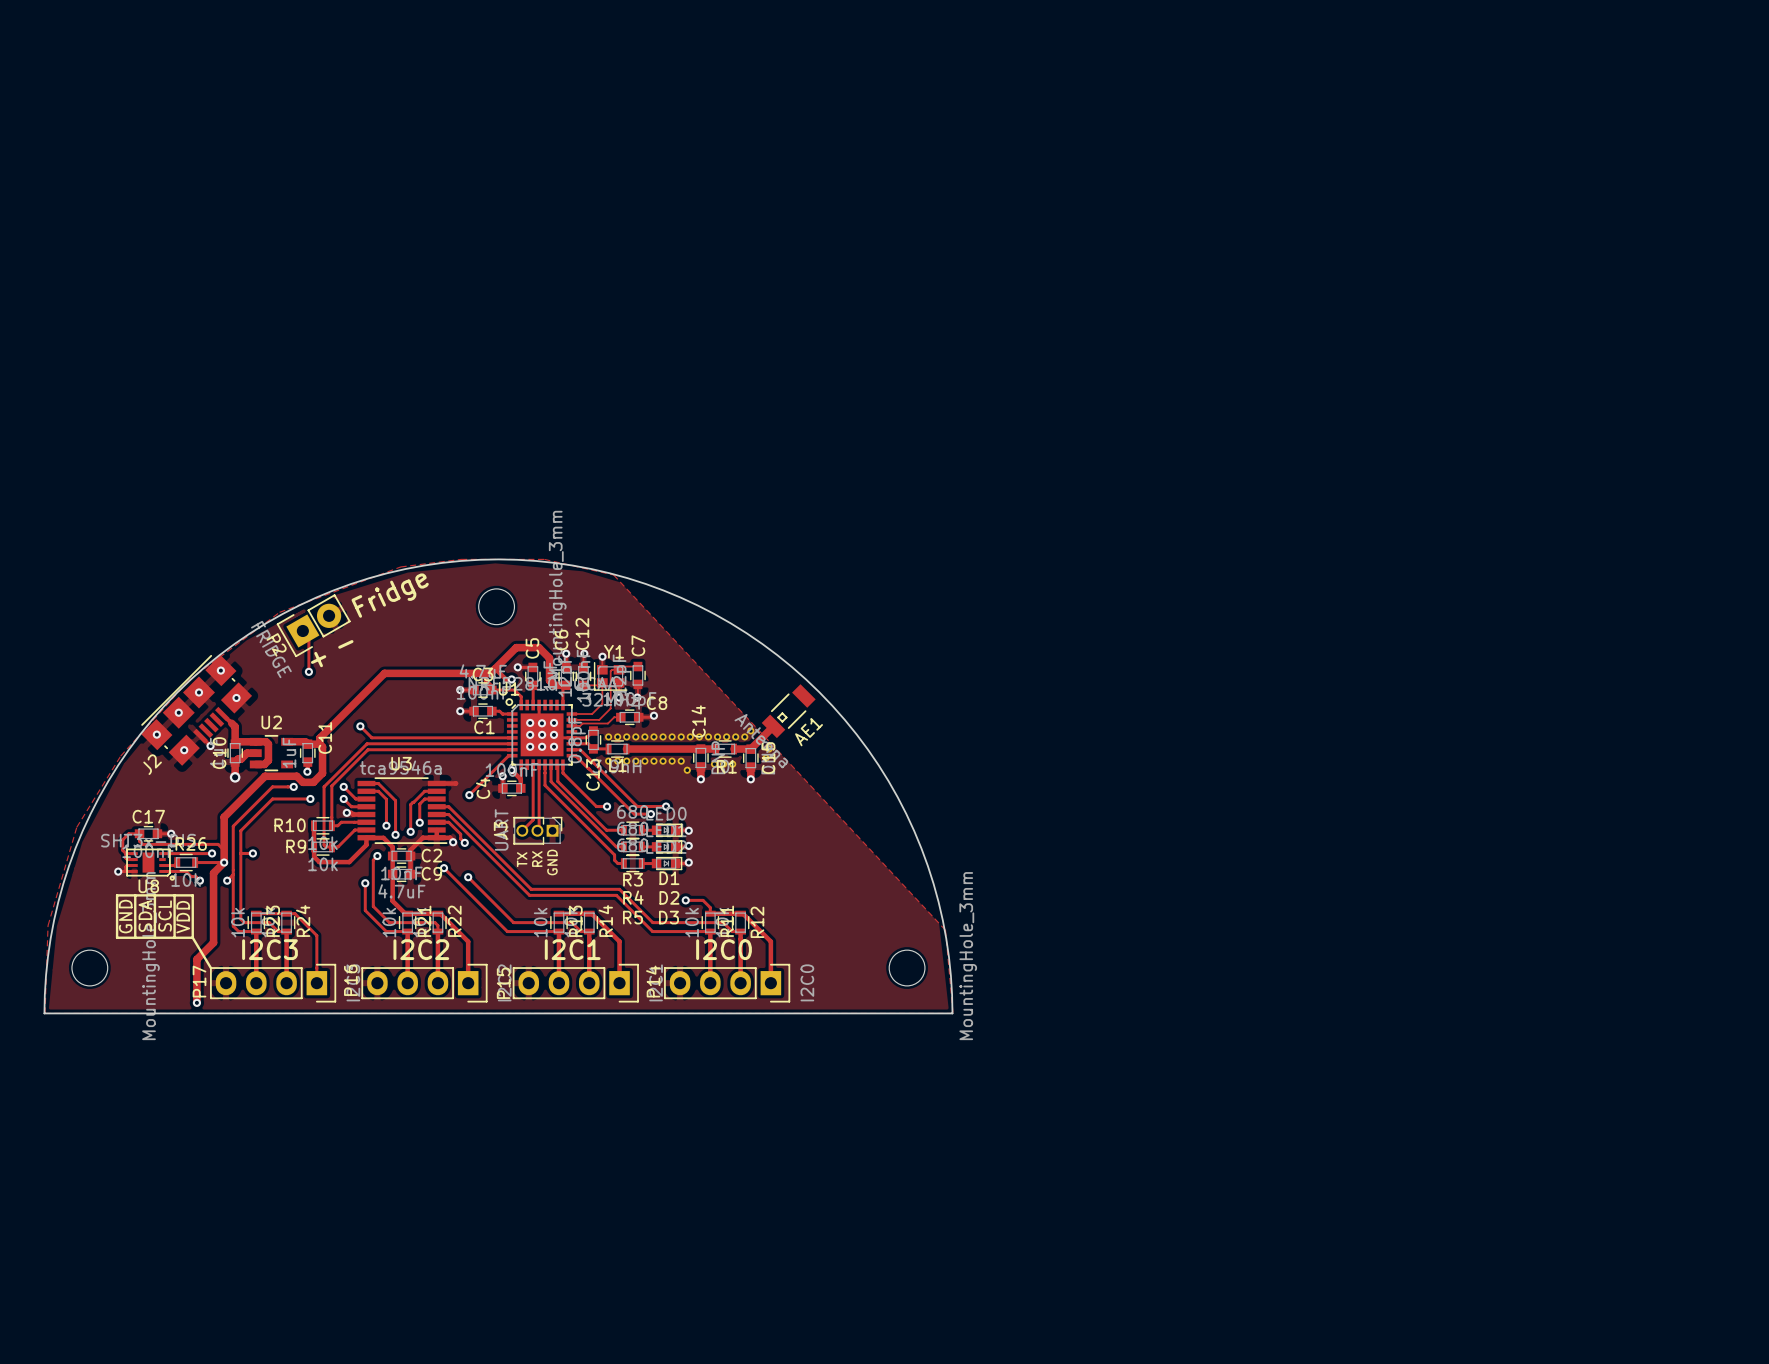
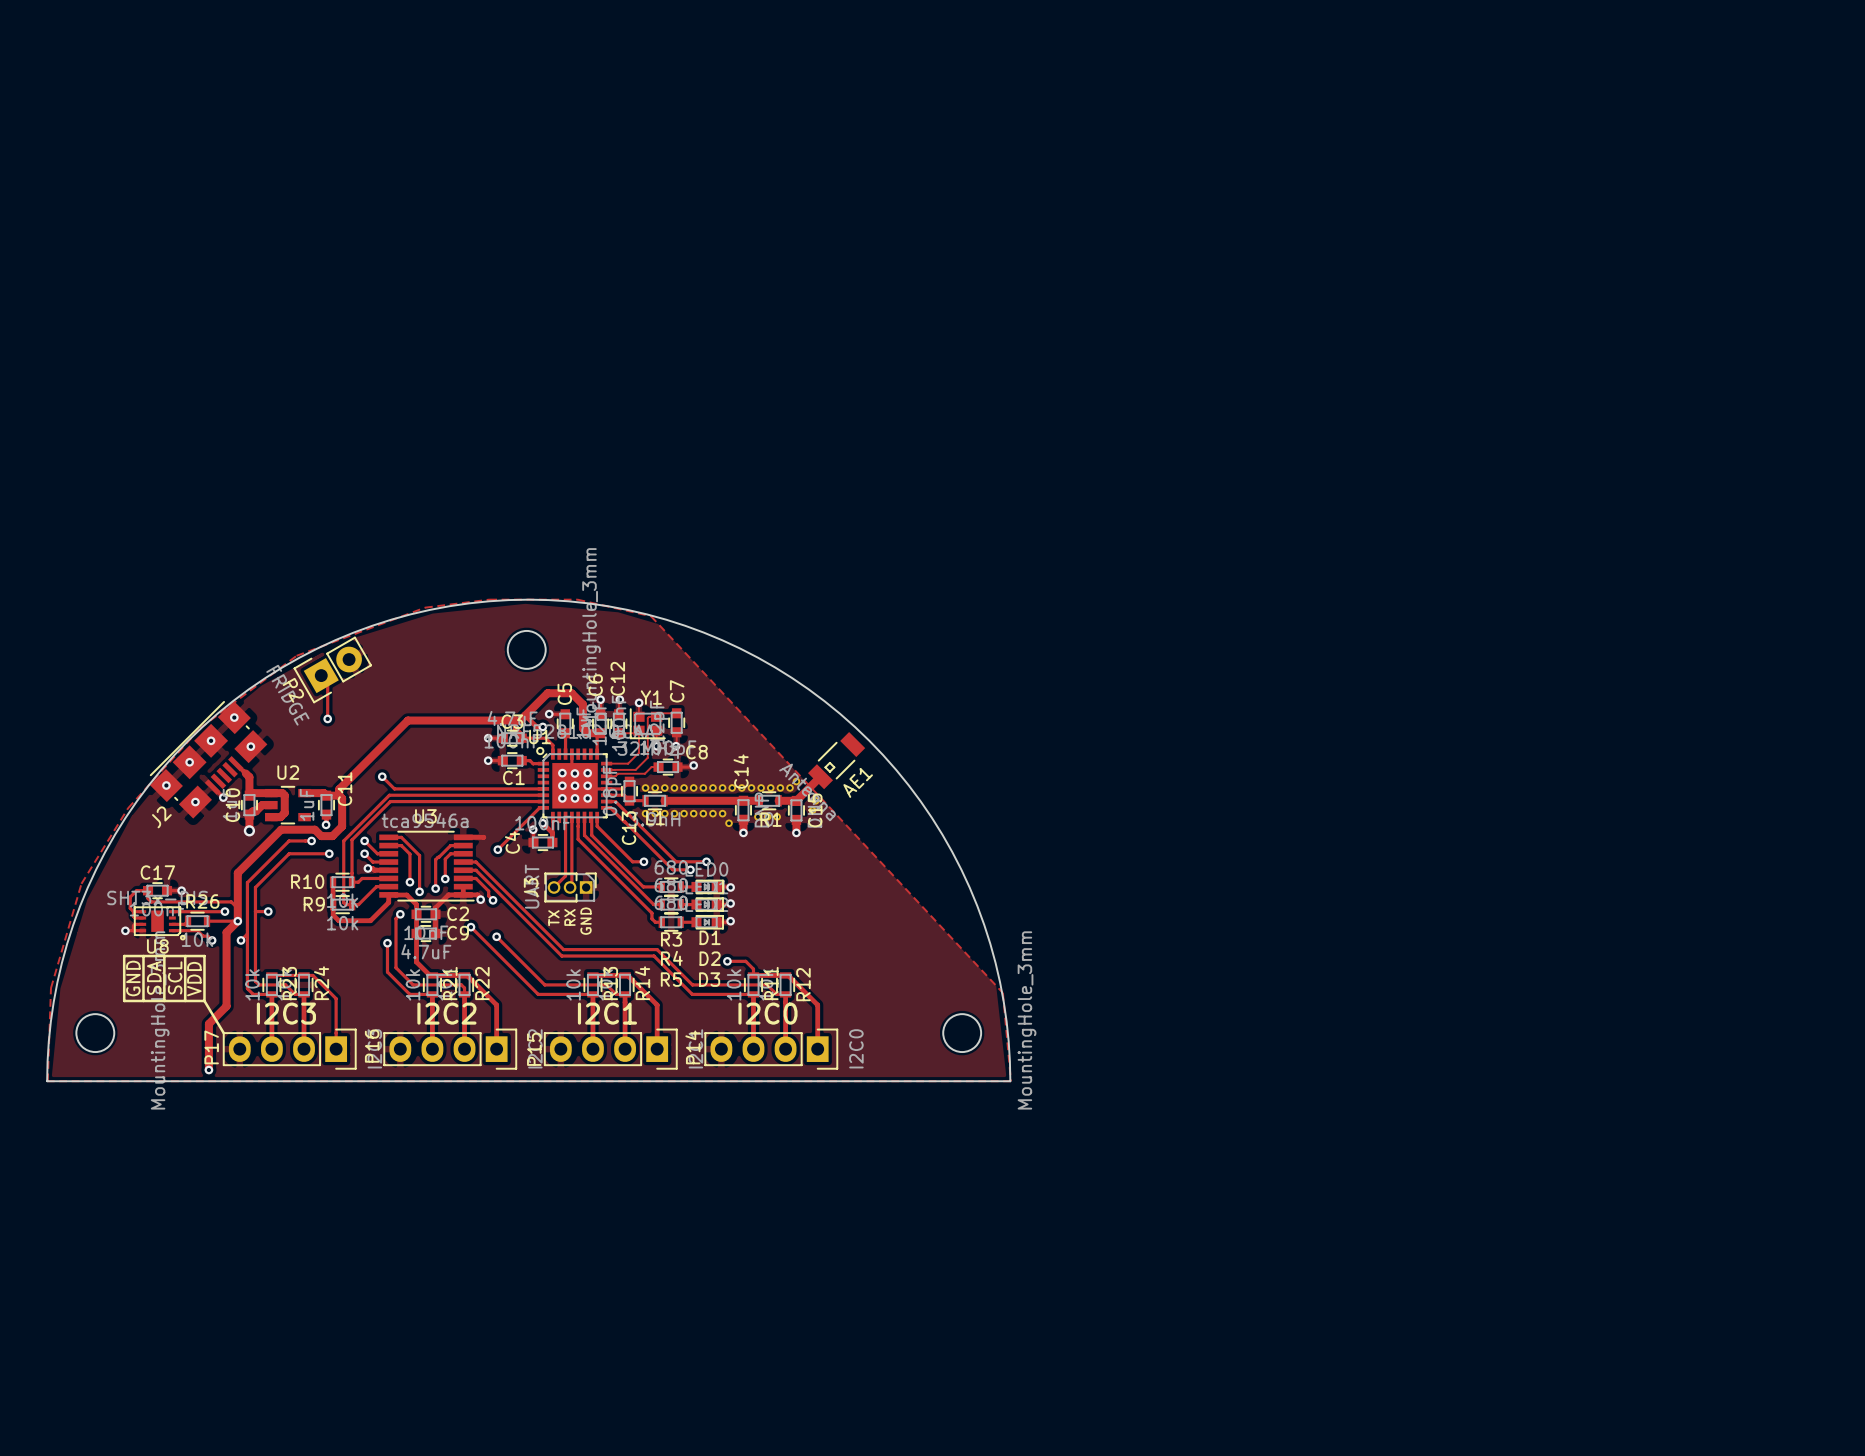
text: Fridge (390, 595) -> none
text: - (345, 644) -> none
text: + (318, 659) -> none

